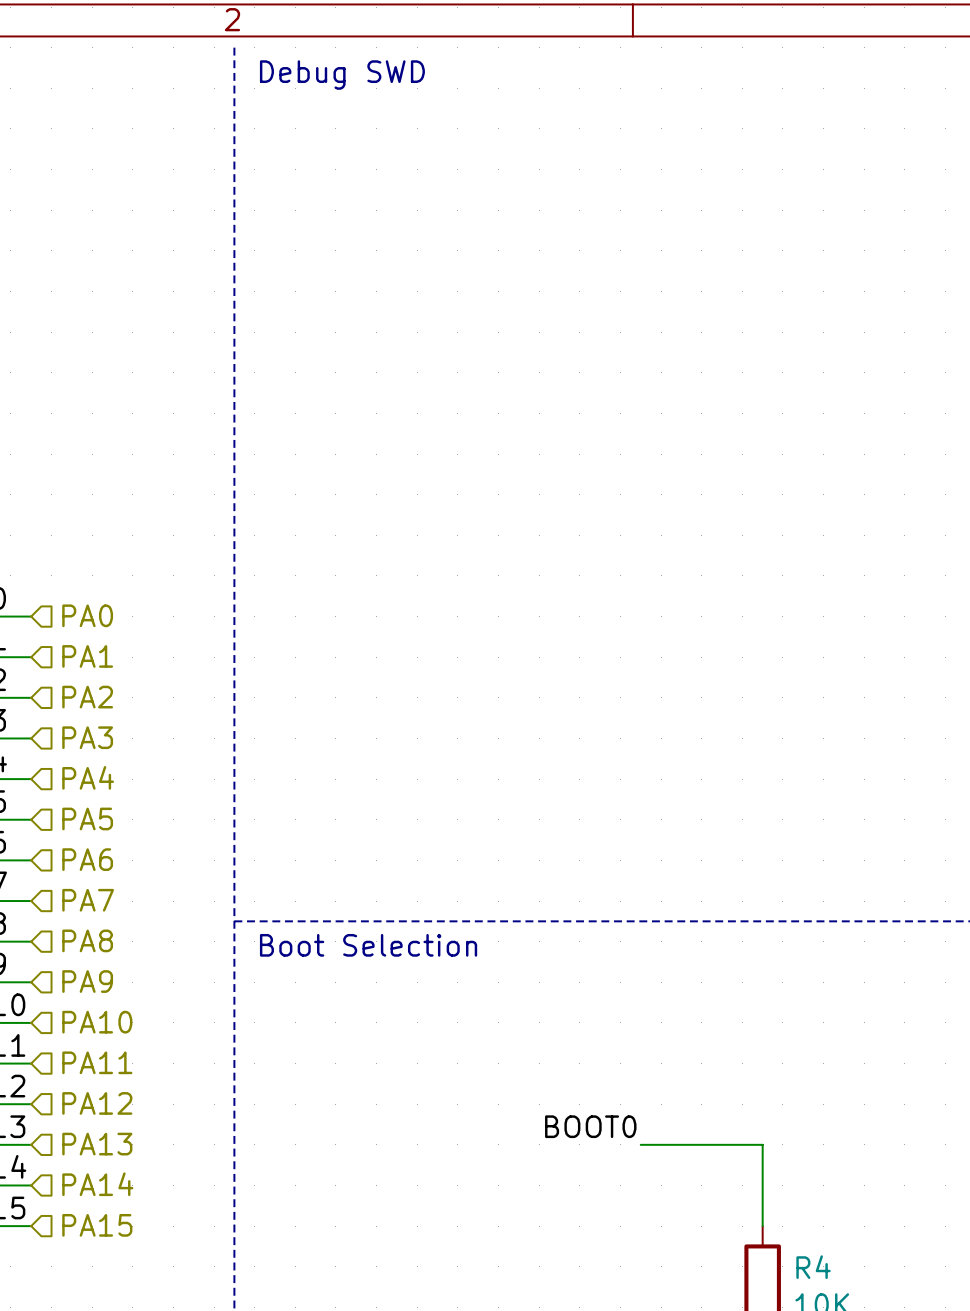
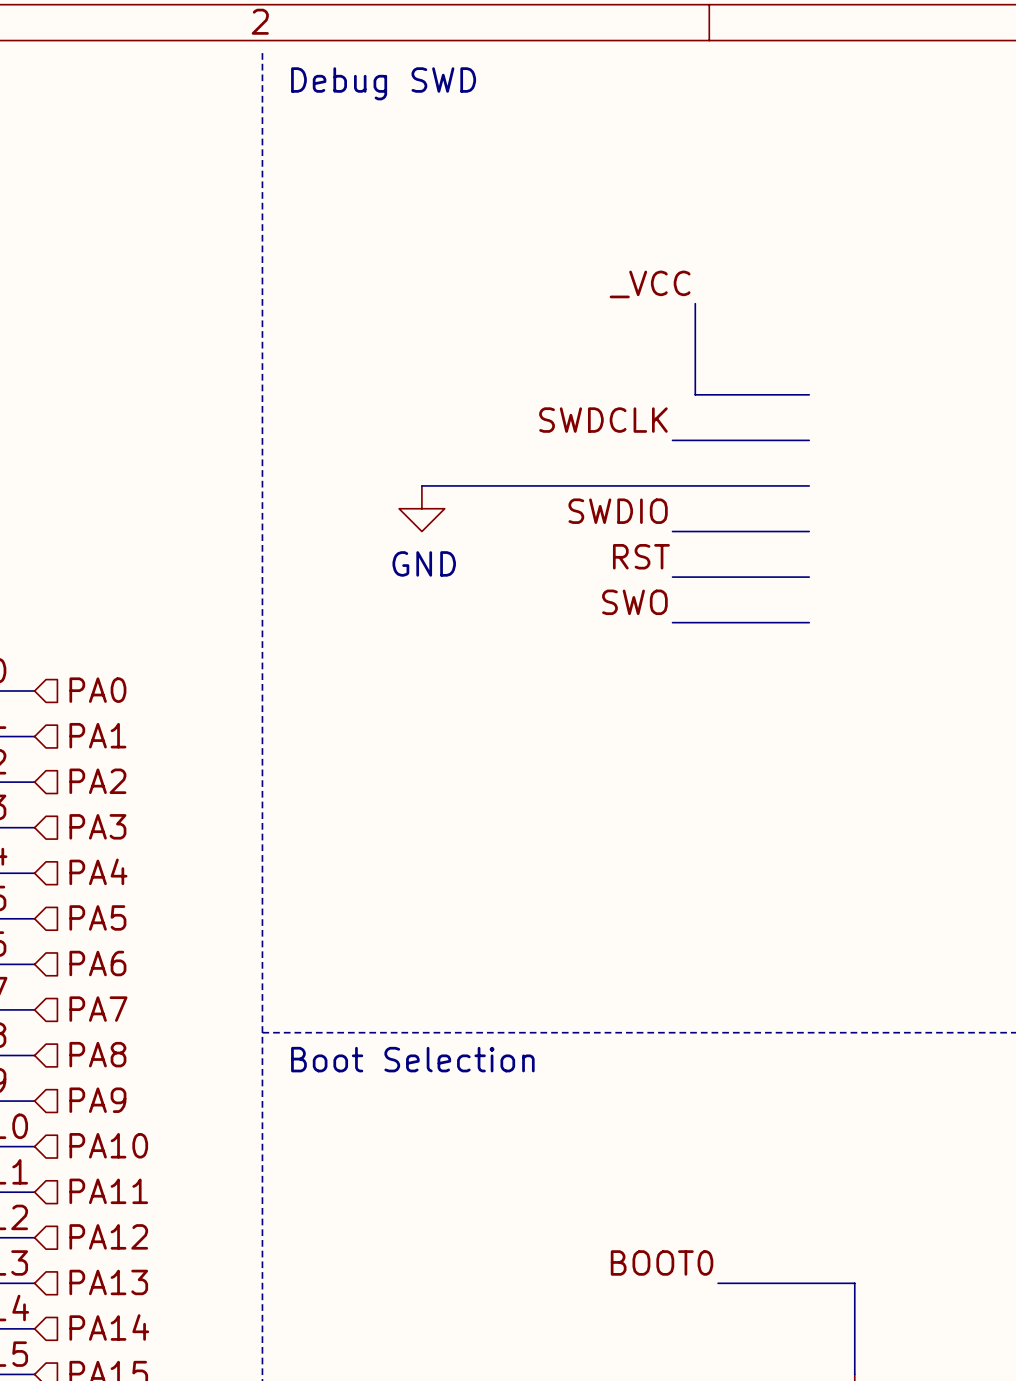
label: none -> _VCC (650, 284)
wire: none -> (695, 303) (695, 394) (809, 394)
label: none -> SWDCLK (603, 420)
wire: none -> (672, 440) (809, 440)
wire: none -> (421, 485) (809, 485)
power symbol: none -> GND (421, 508)
label: none -> SWDIO (618, 511)
wire: none -> (672, 531) (809, 531)
label: none -> RST (641, 556)
wire: none -> (672, 577) (809, 577)
label: none -> SWO (634, 602)
wire: none -> (672, 622) (809, 622)

